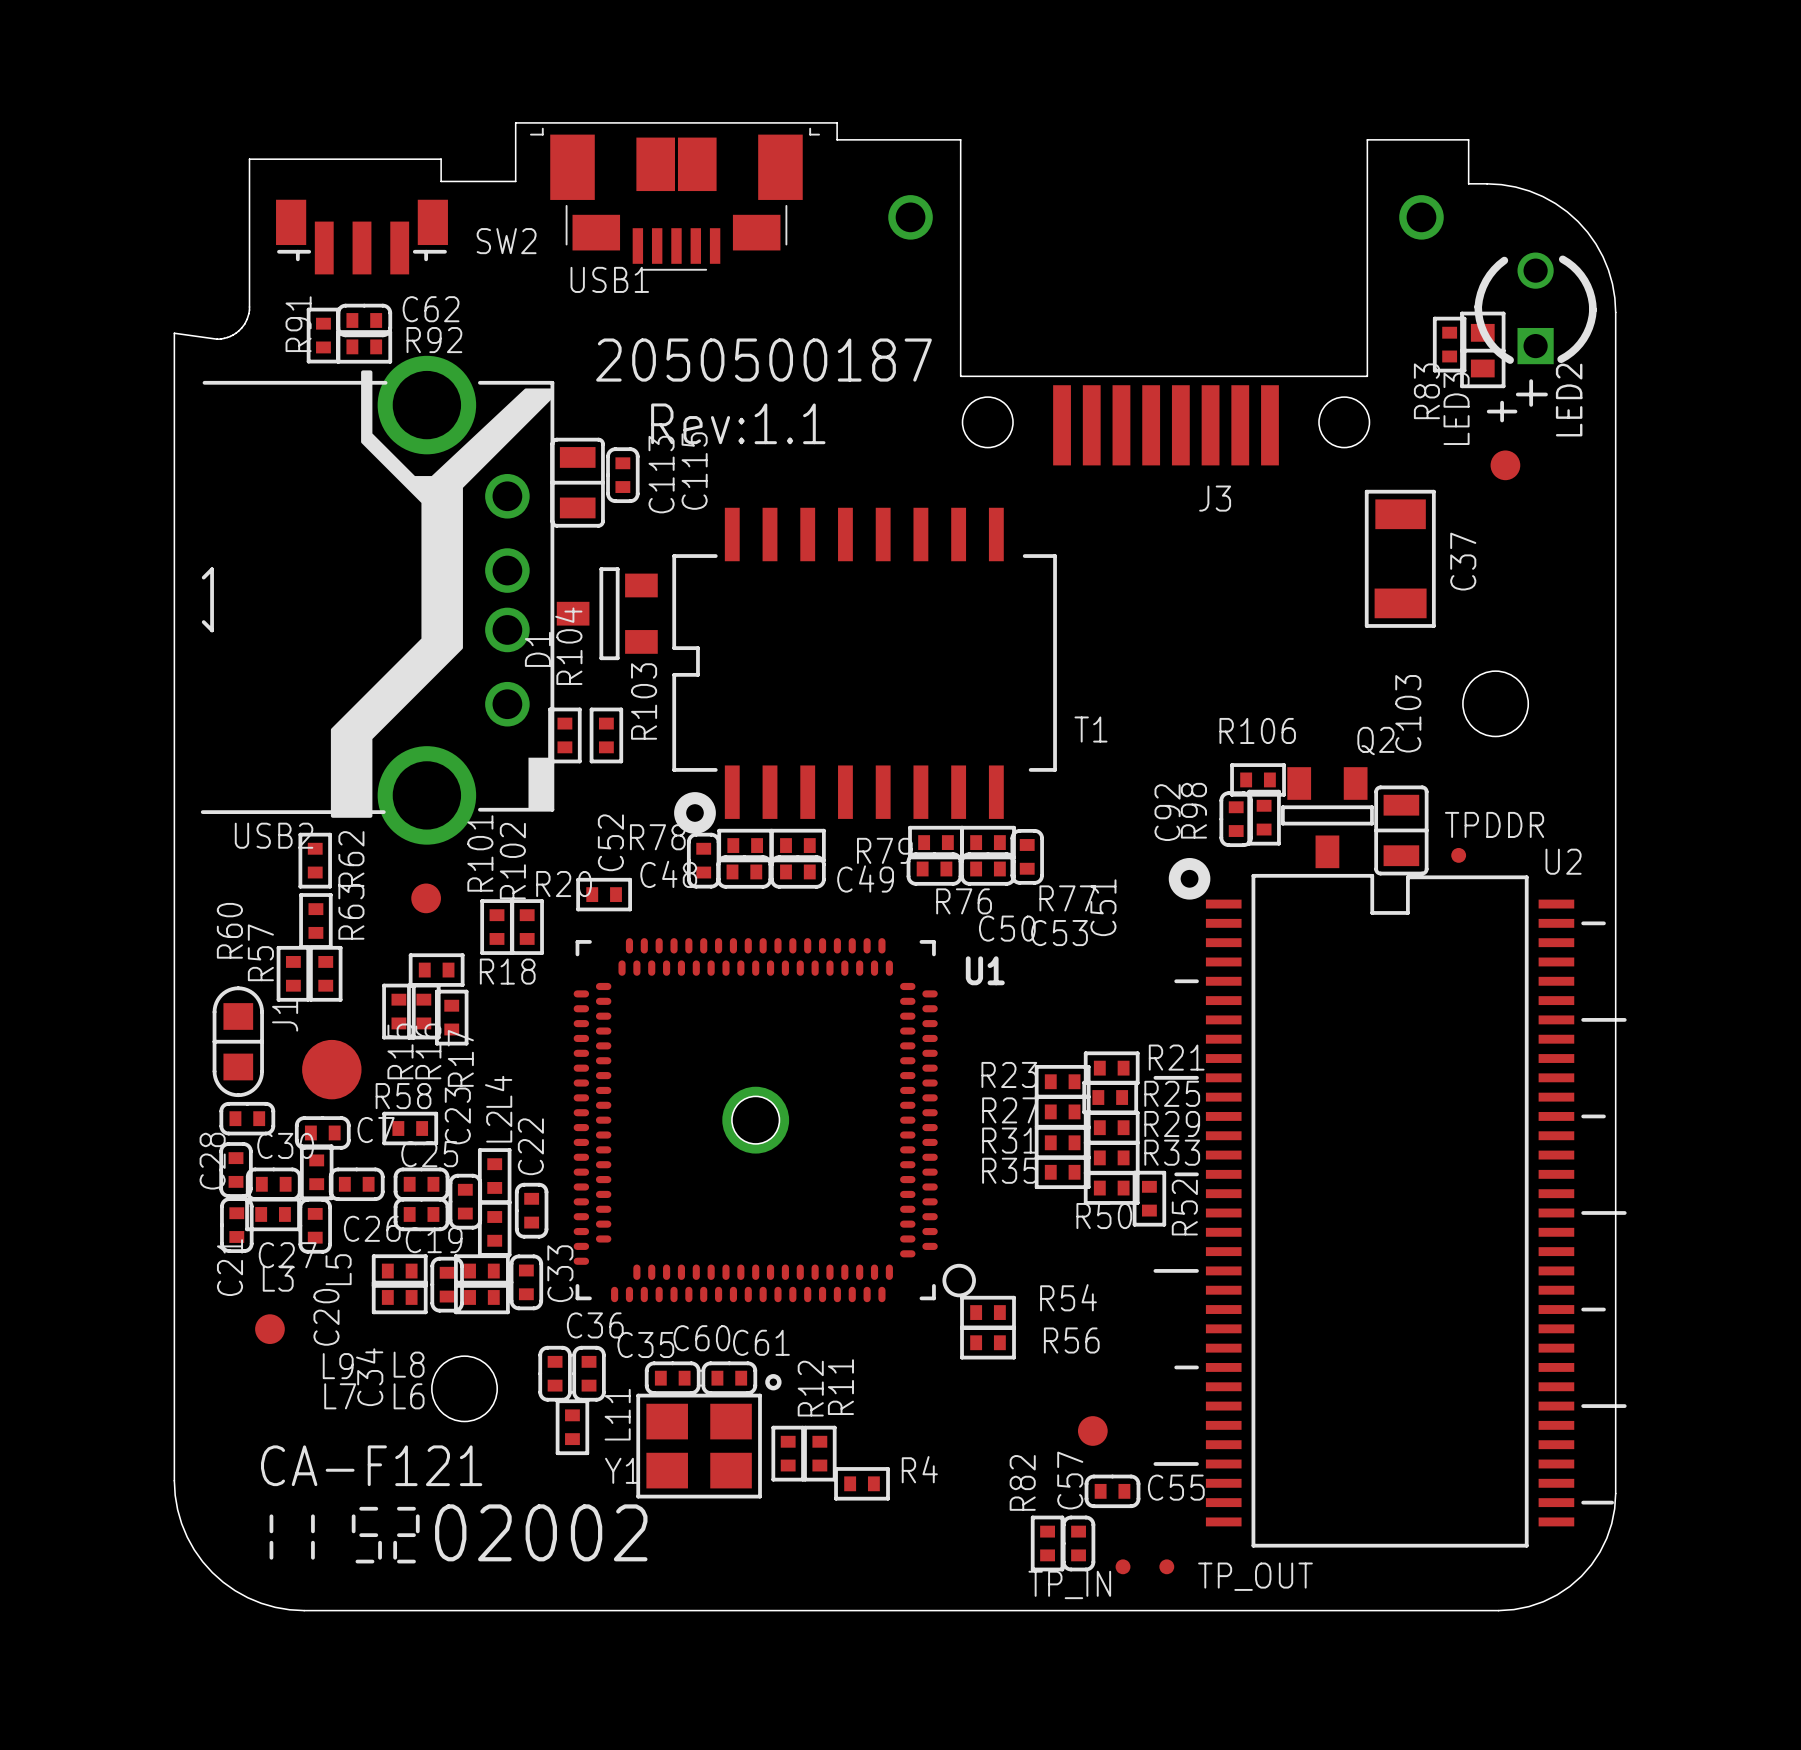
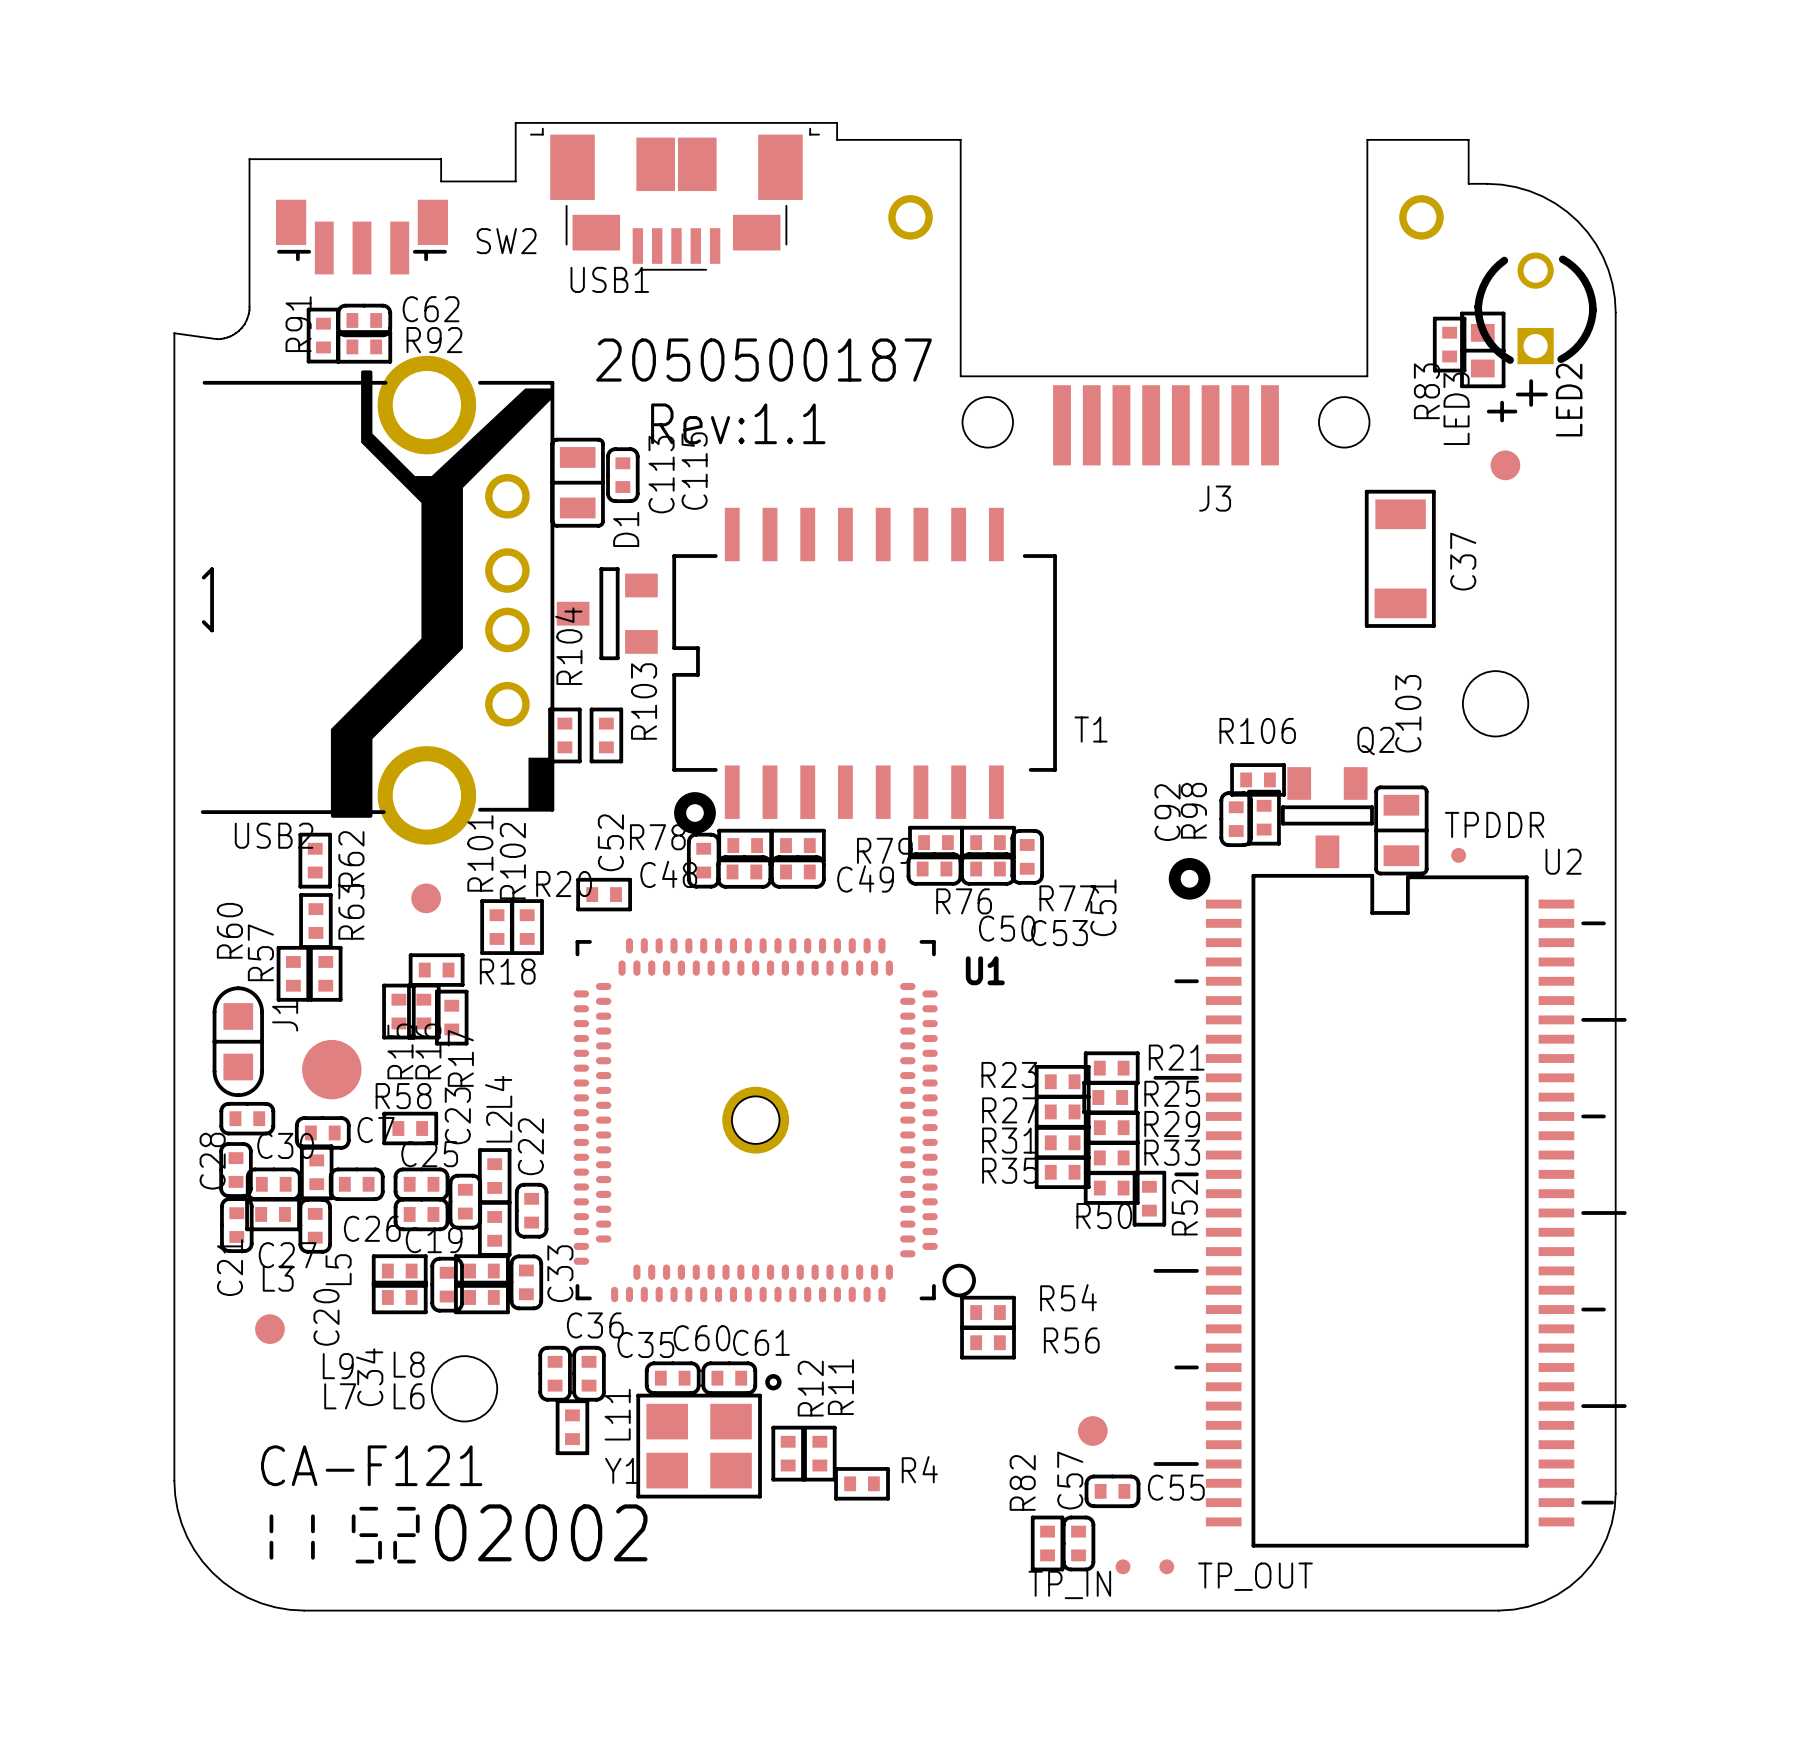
D1 name position: D1 (537, 649) -> D1 (626, 529)

